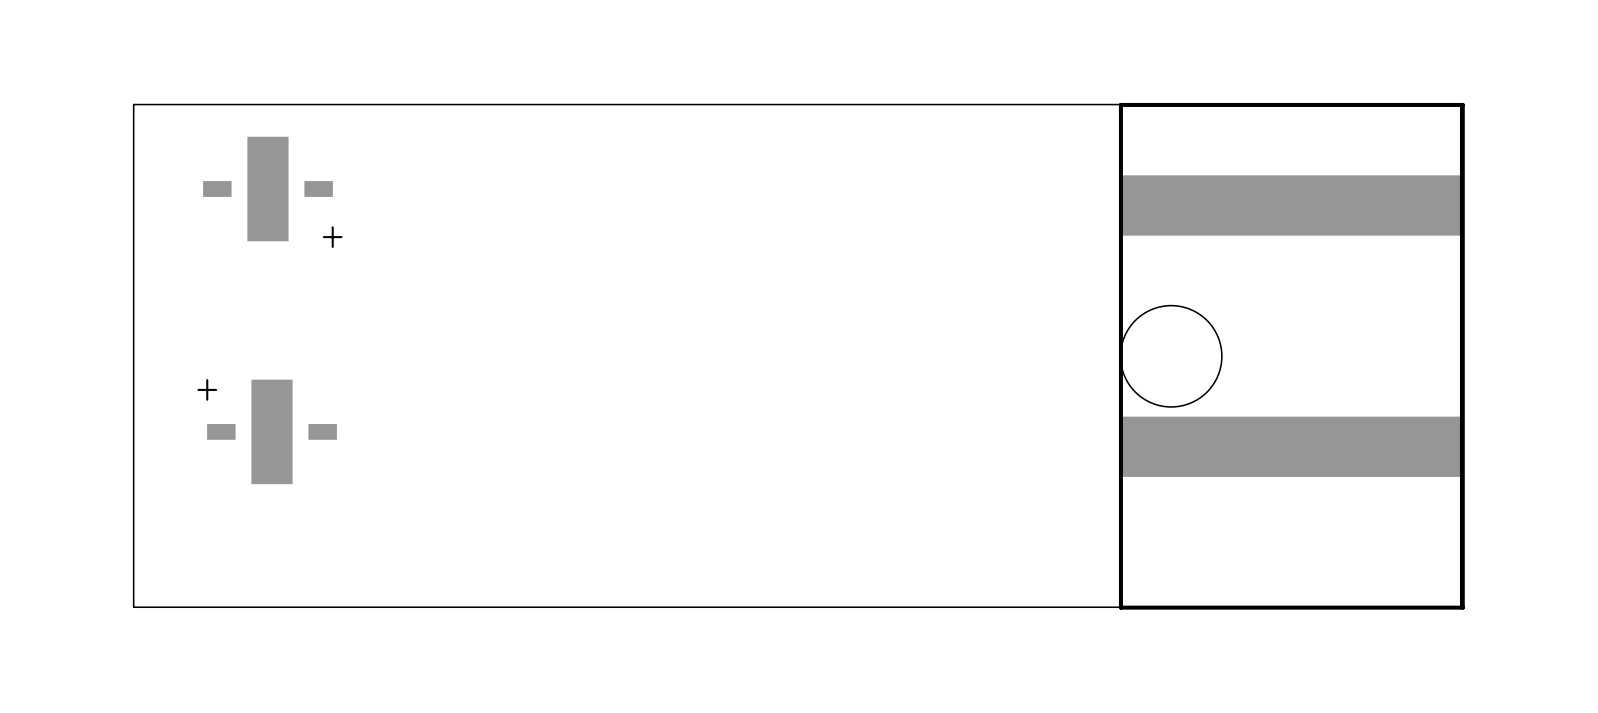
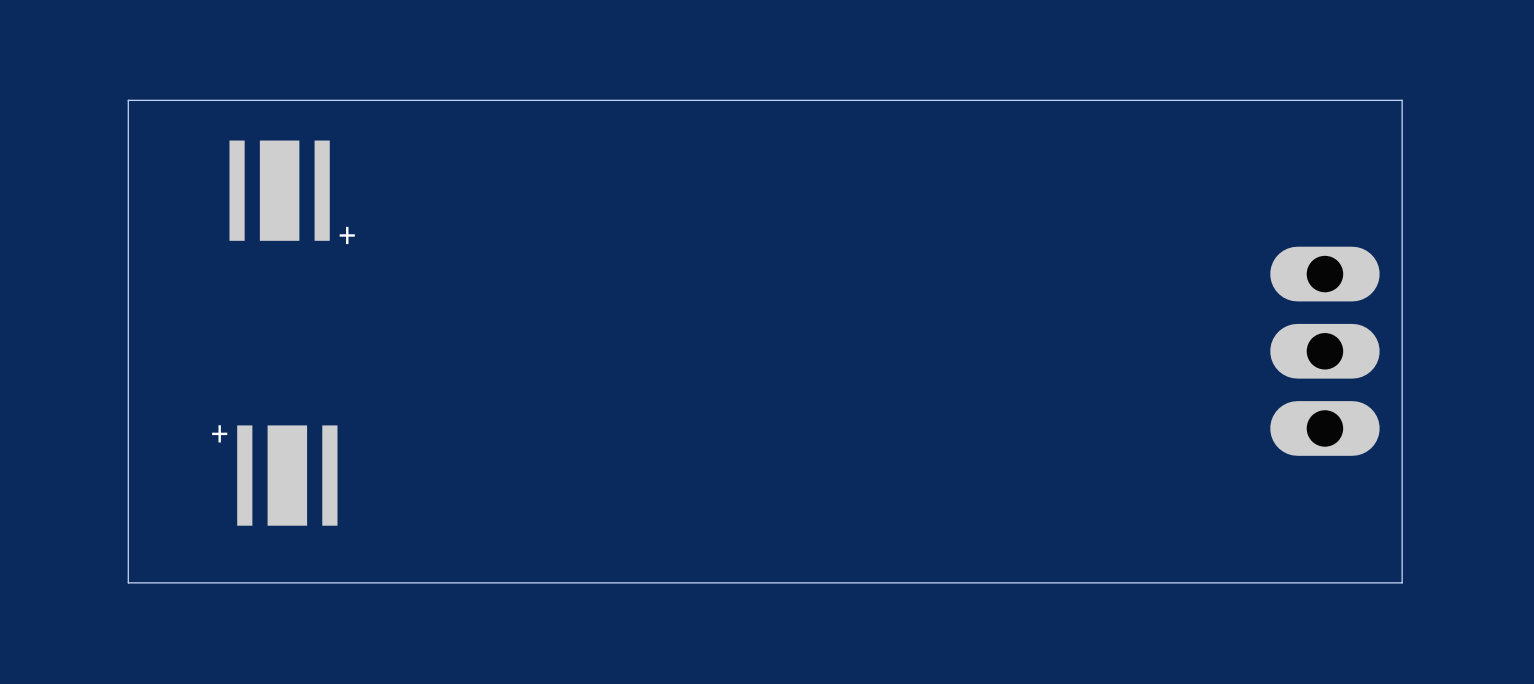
part footprint: [203, 136, 333, 242] -> [229, 140, 330, 241]
part: (1291, 356) -> none
part: none -> (1324, 351)
part: (272, 431) -> none
part: none -> (287, 475)

